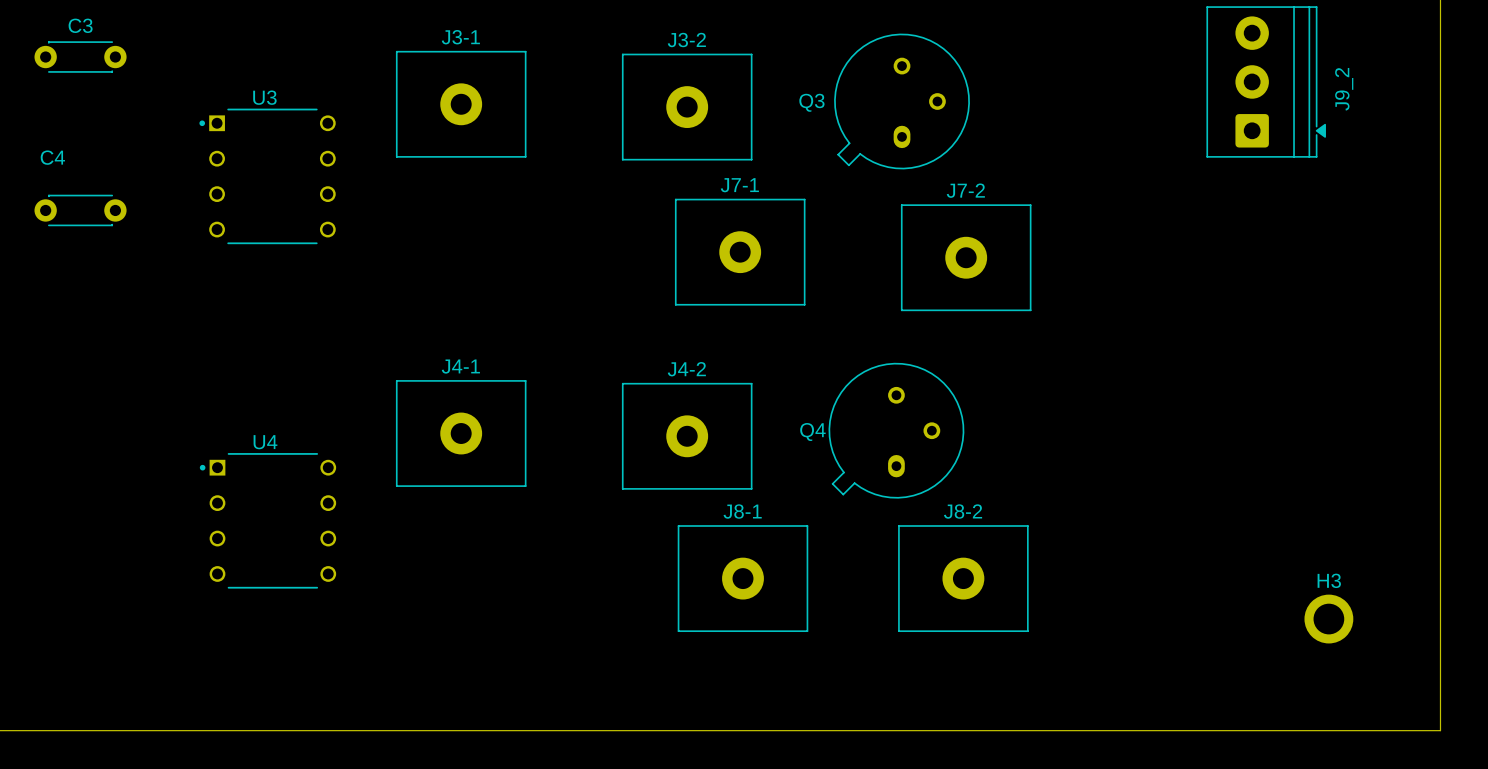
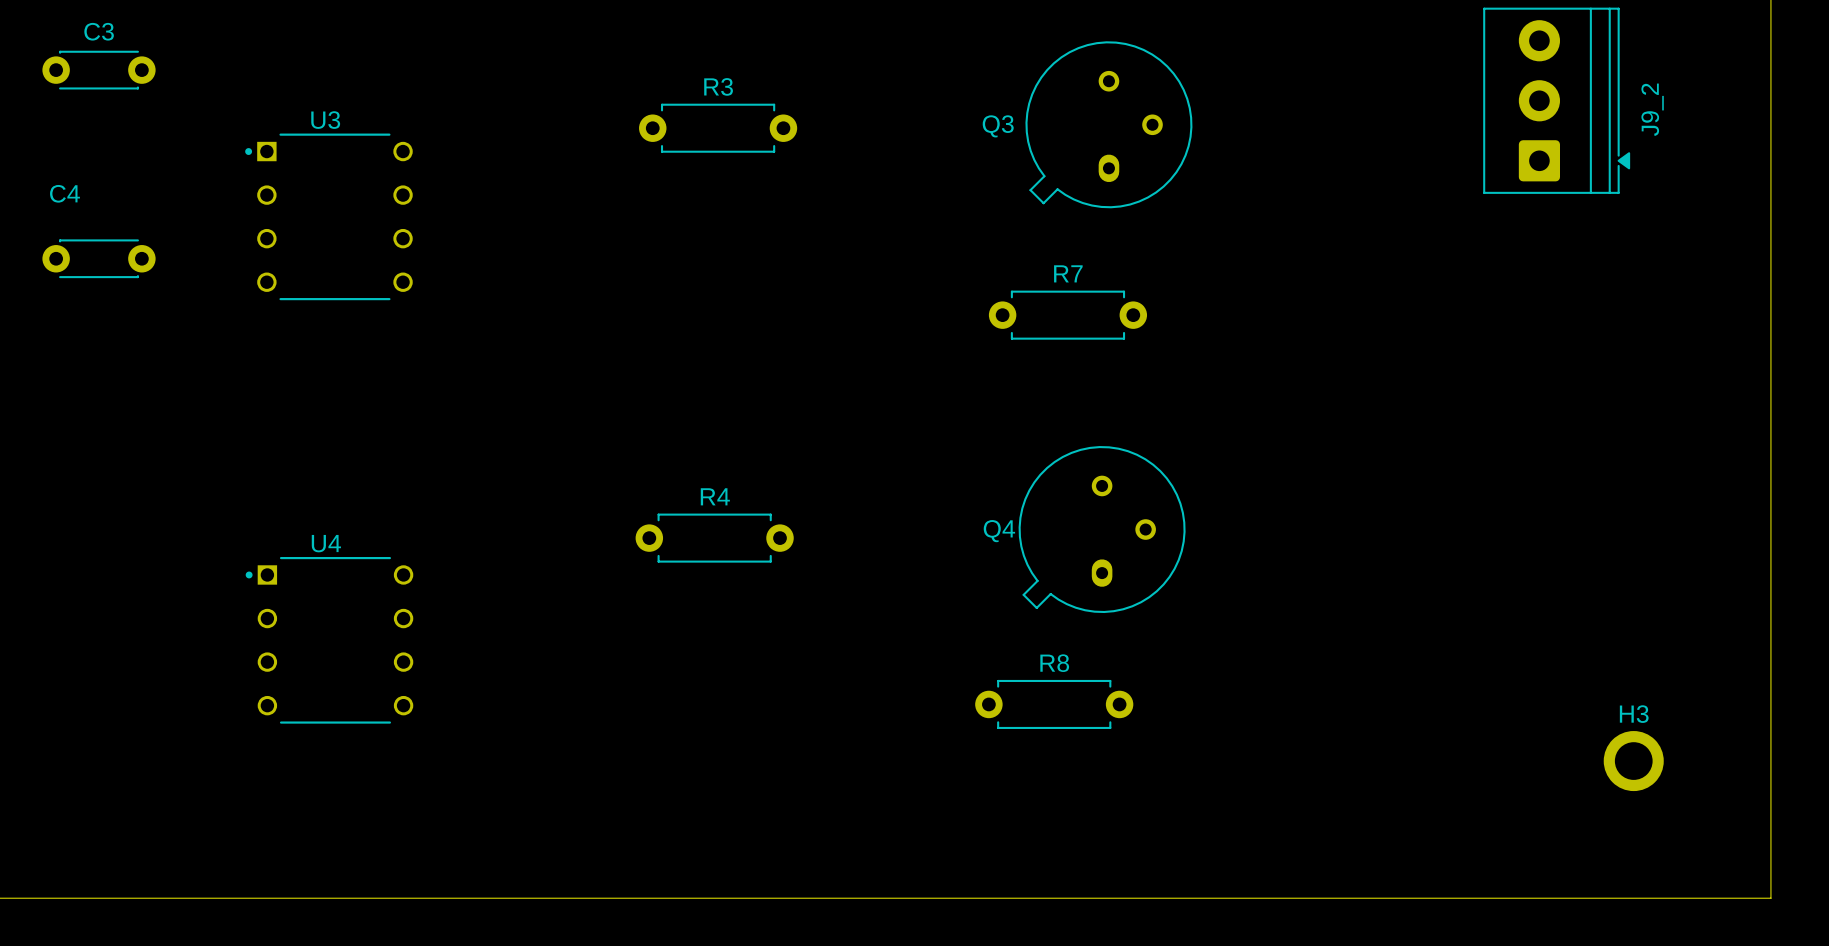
J3-1: (461, 104) -> none
R3: none -> (718, 128)
J3-2: (687, 107) -> none
J7-1: (740, 252) -> none
R7: none -> (1067, 315)
J7-2: (966, 257) -> none
J4-1: (461, 433) -> none
J4-2: (687, 436) -> none
R4: none -> (714, 538)
R8: none -> (1054, 704)
J8-1: (742, 578) -> none
J8-2: (963, 578) -> none

